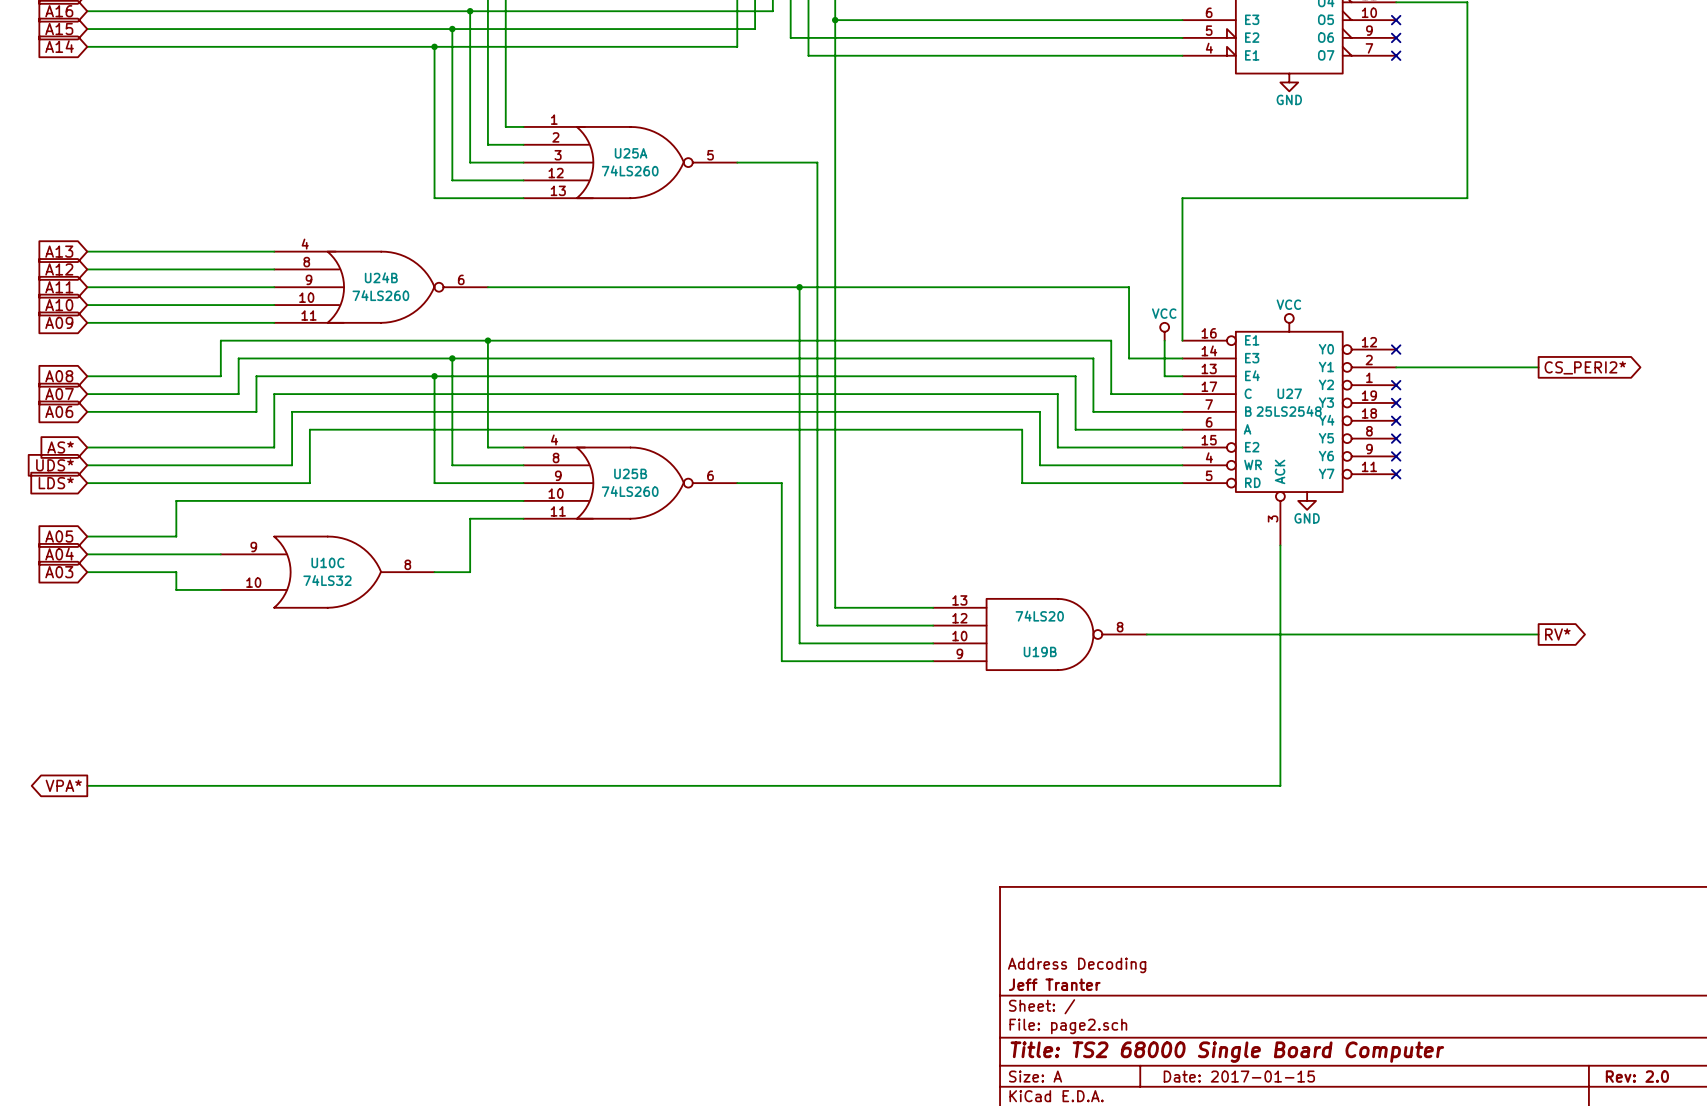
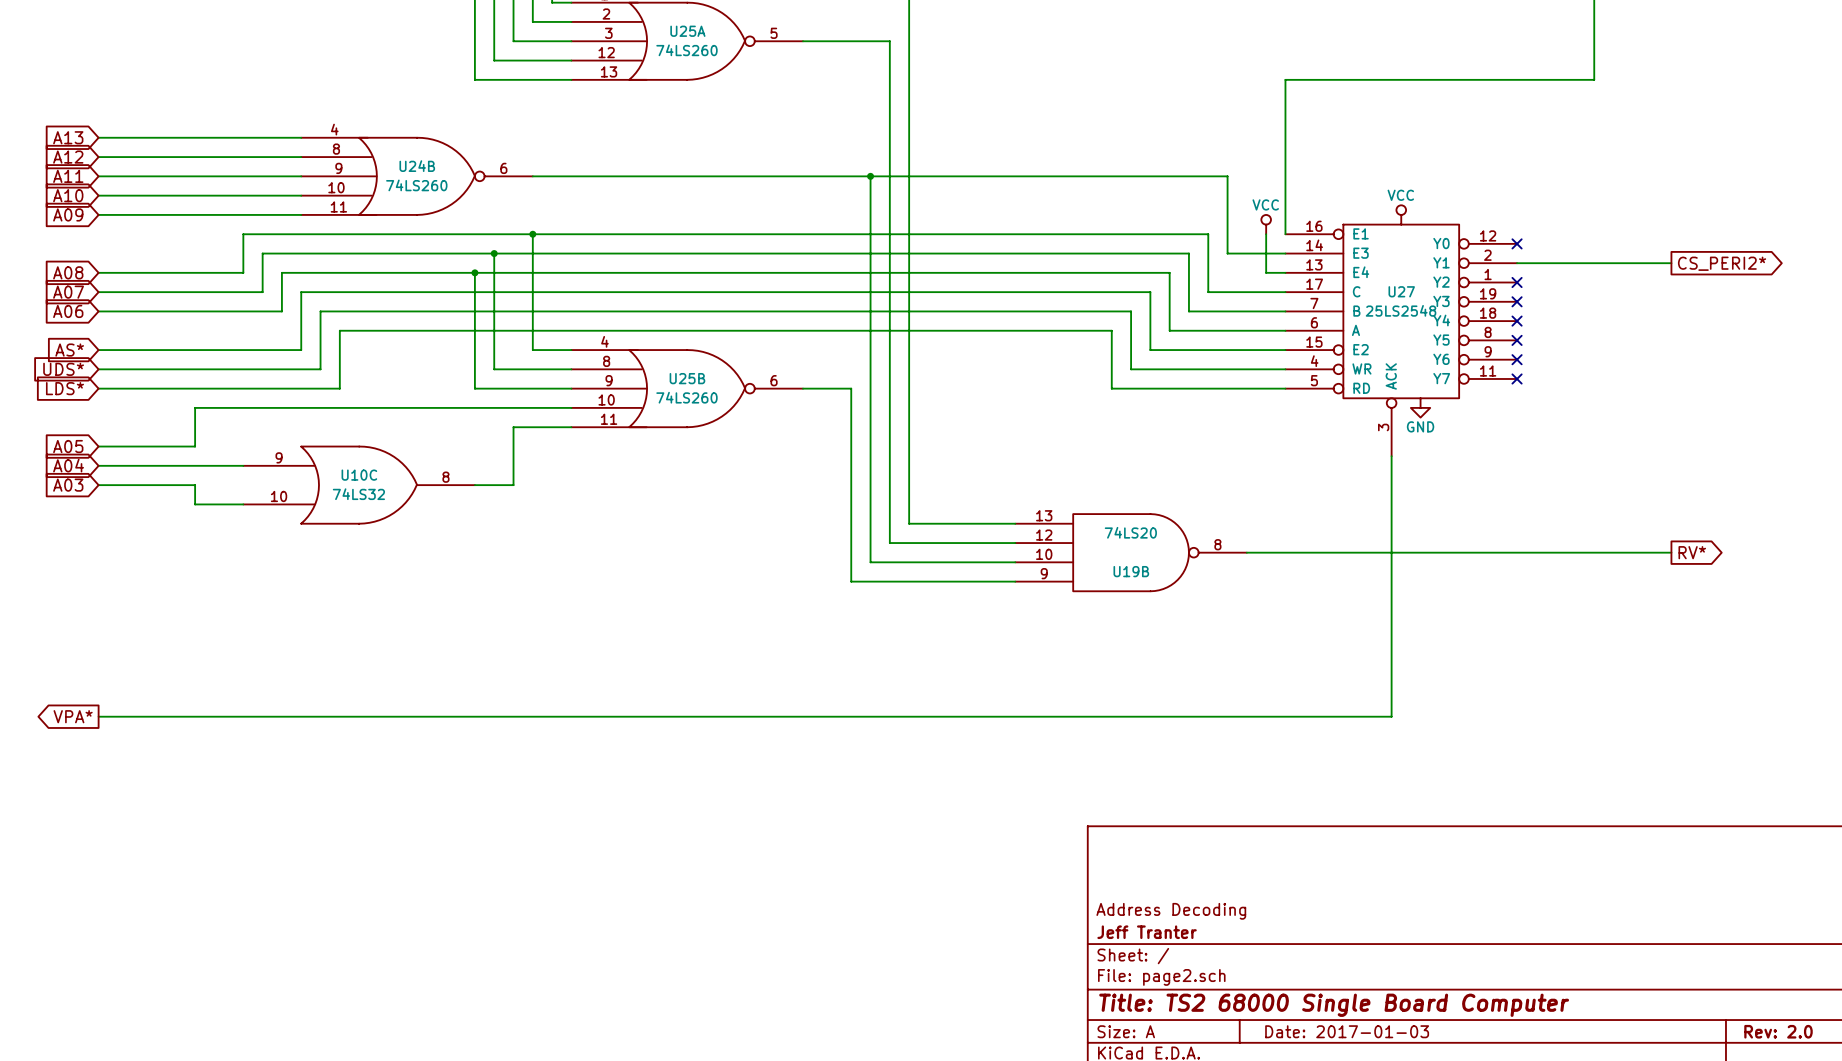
title block: Date: 2017-01-15 (1239, 1076) -> Date: 2017-01-03 (1347, 1031)

